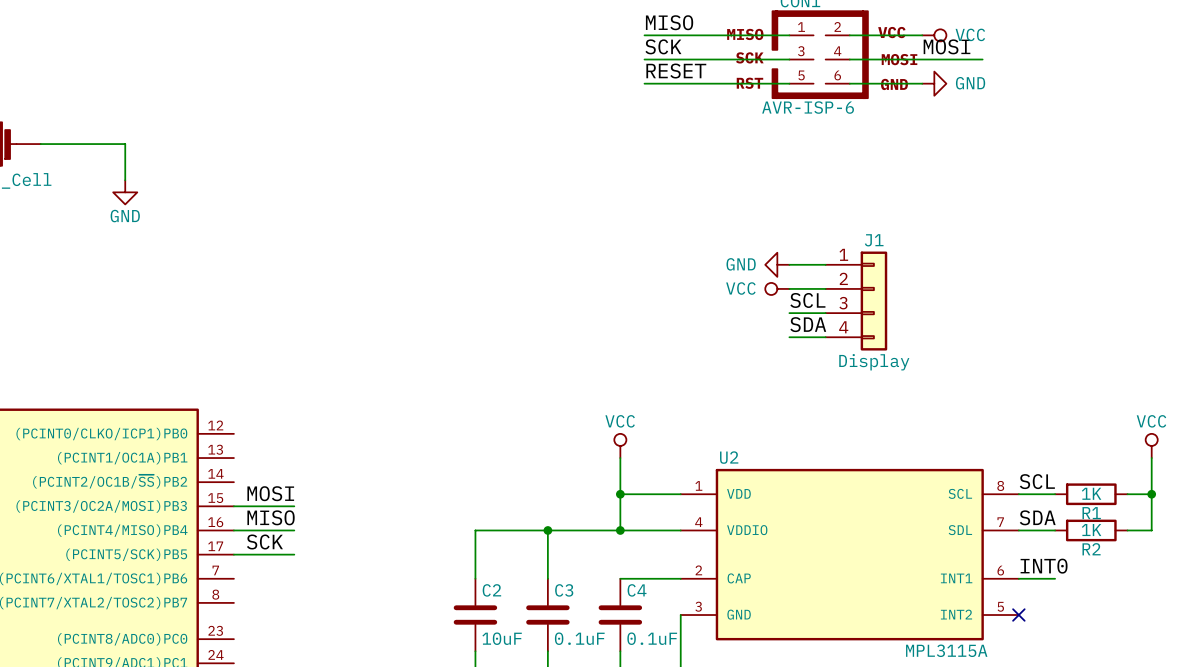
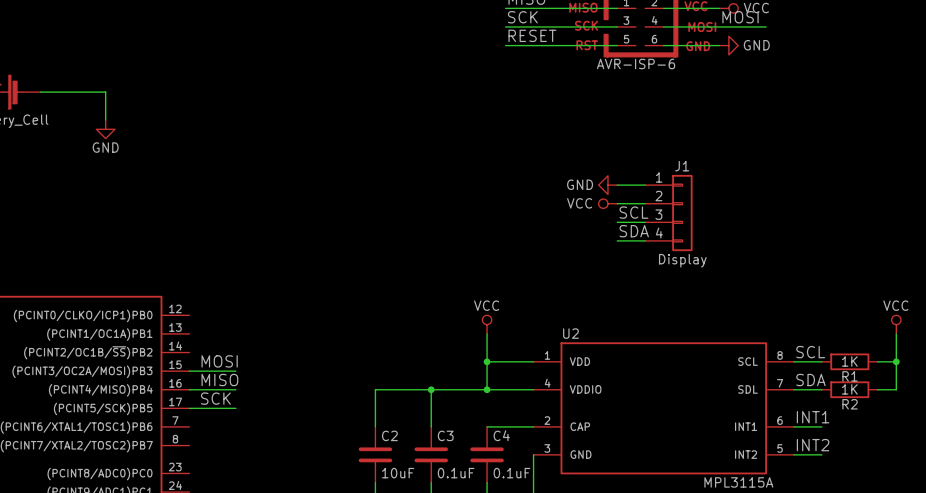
label: INT0 (1044, 566) -> INT1 (813, 417)
label: none -> INT2 (813, 445)
wire: none -> (794, 454) (821, 454)
no-connect mark: (1018, 615) -> none

